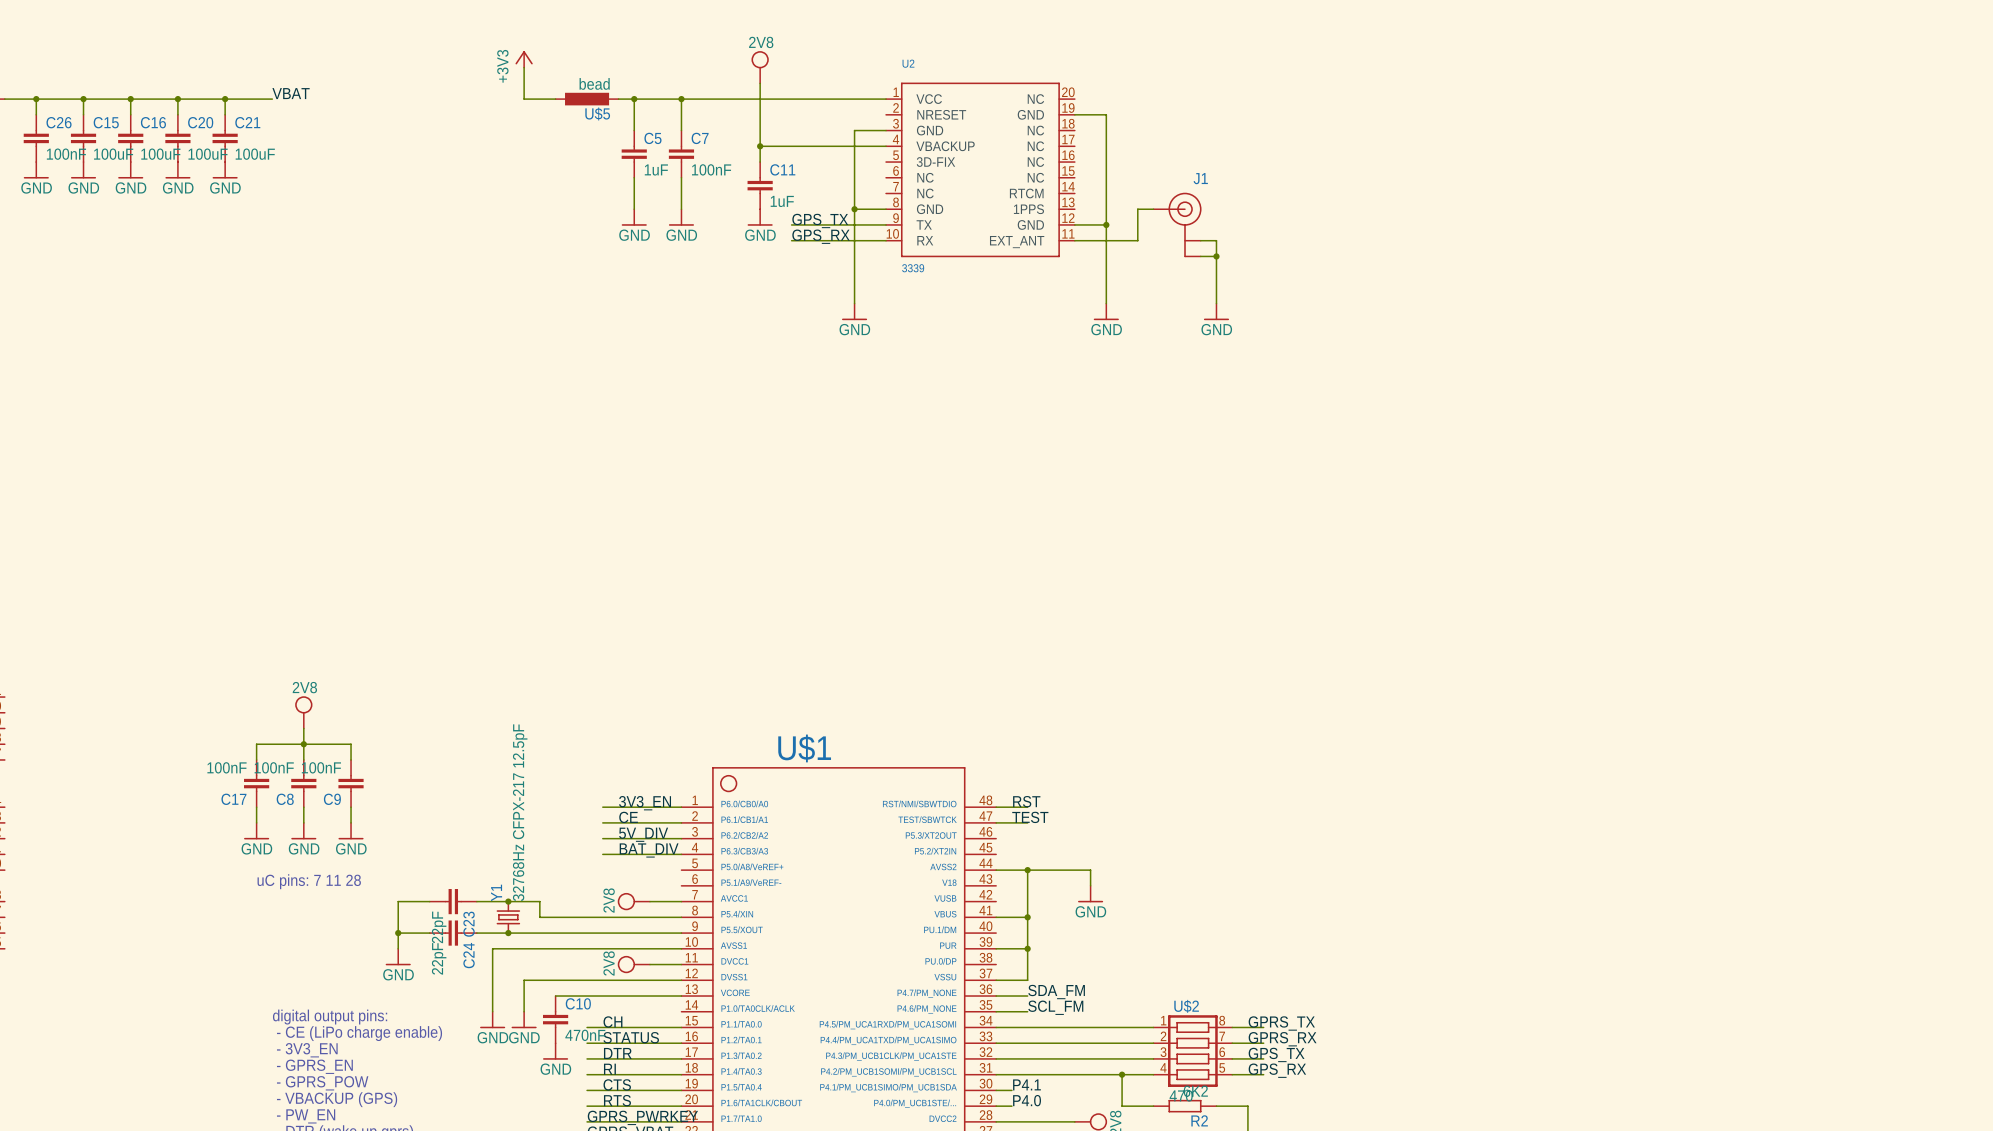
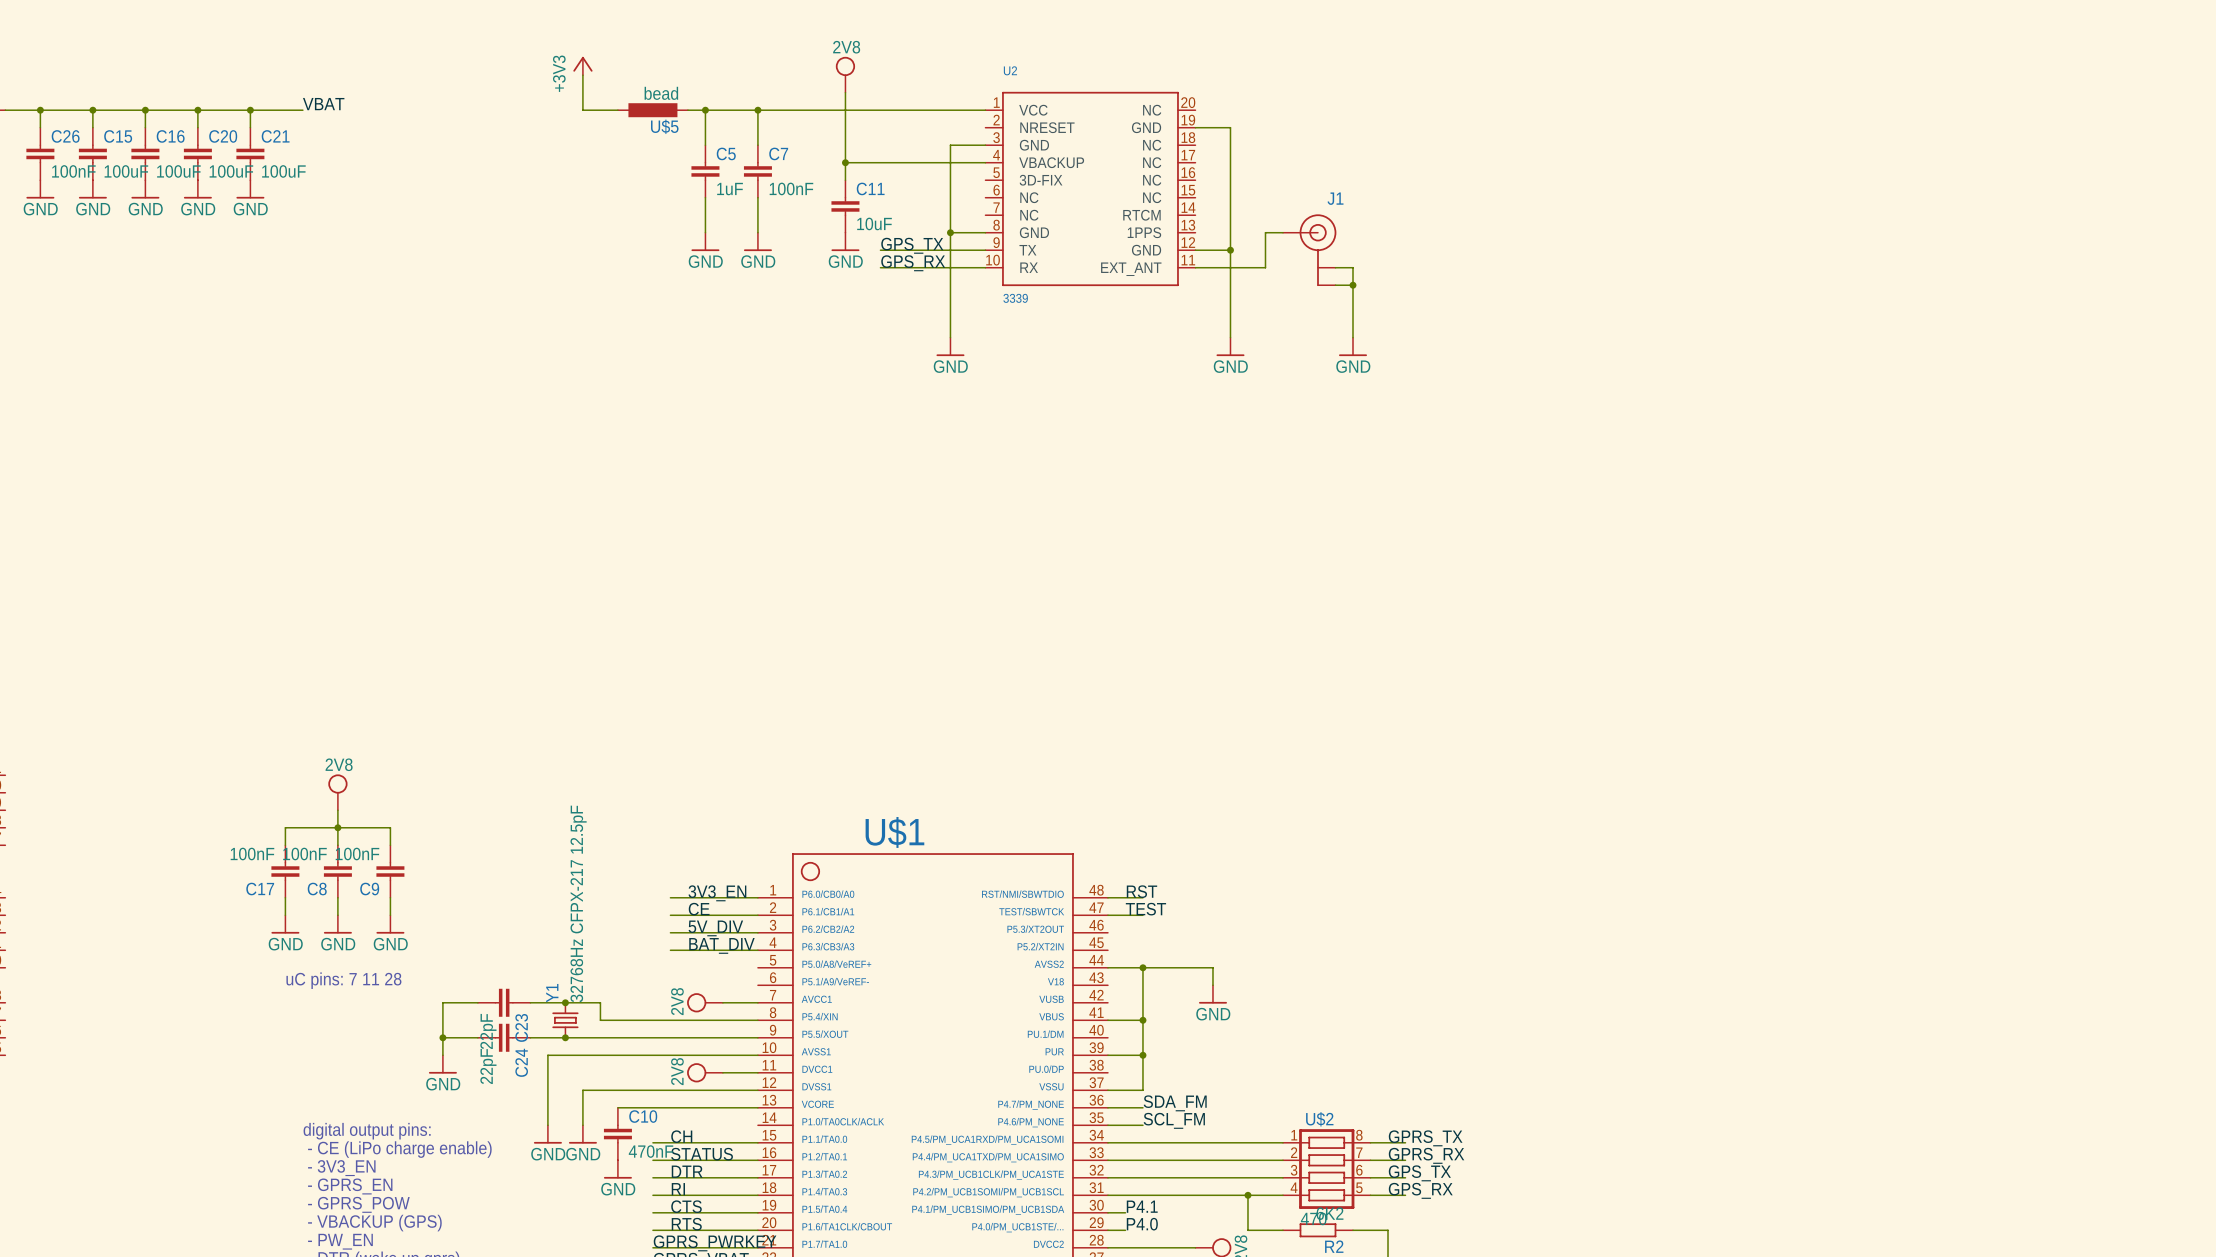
C11 value: 1uF (782, 201) -> 10uF (874, 223)

